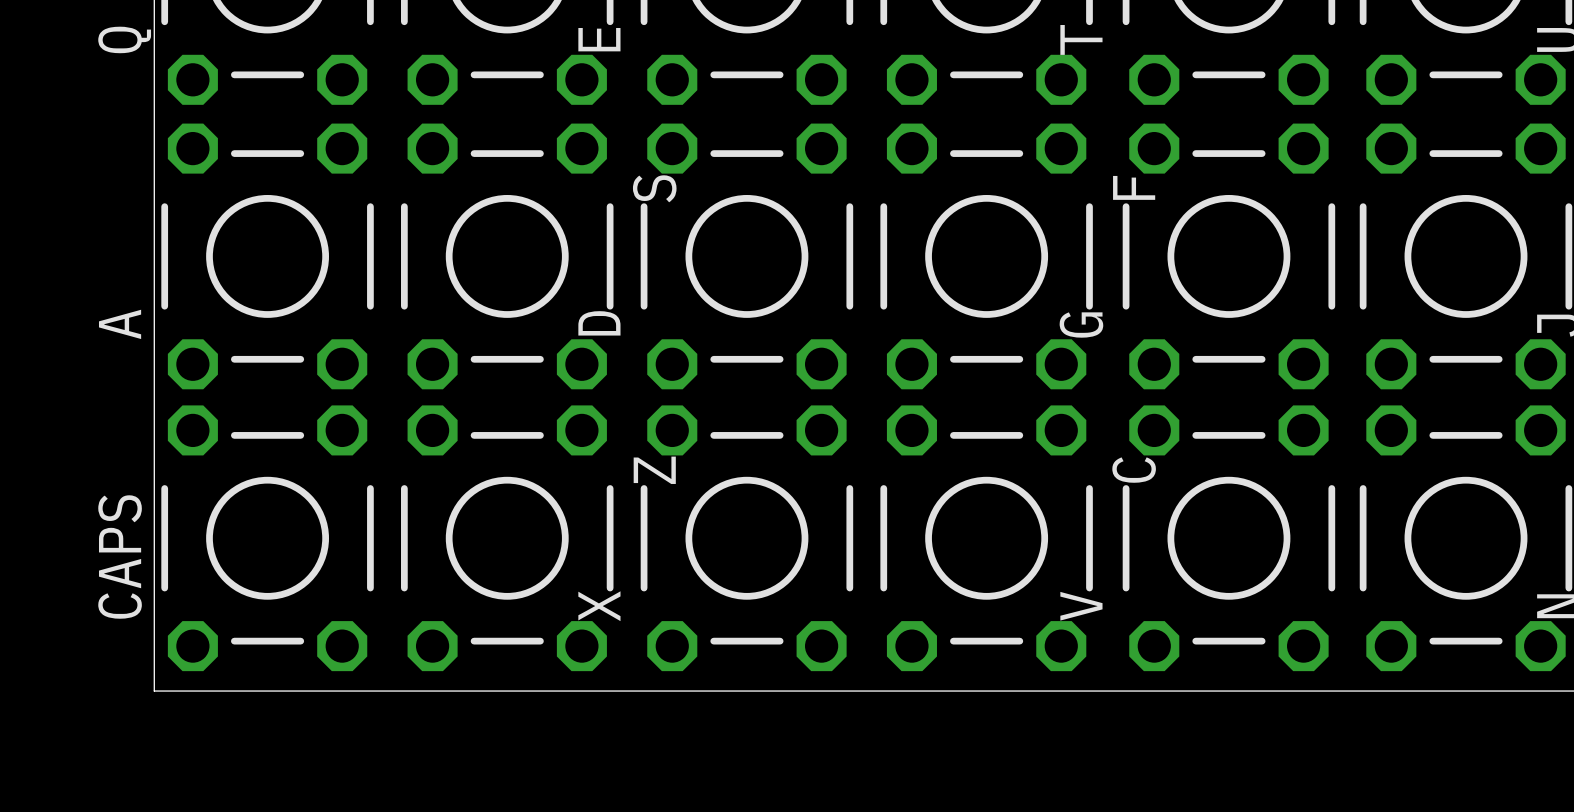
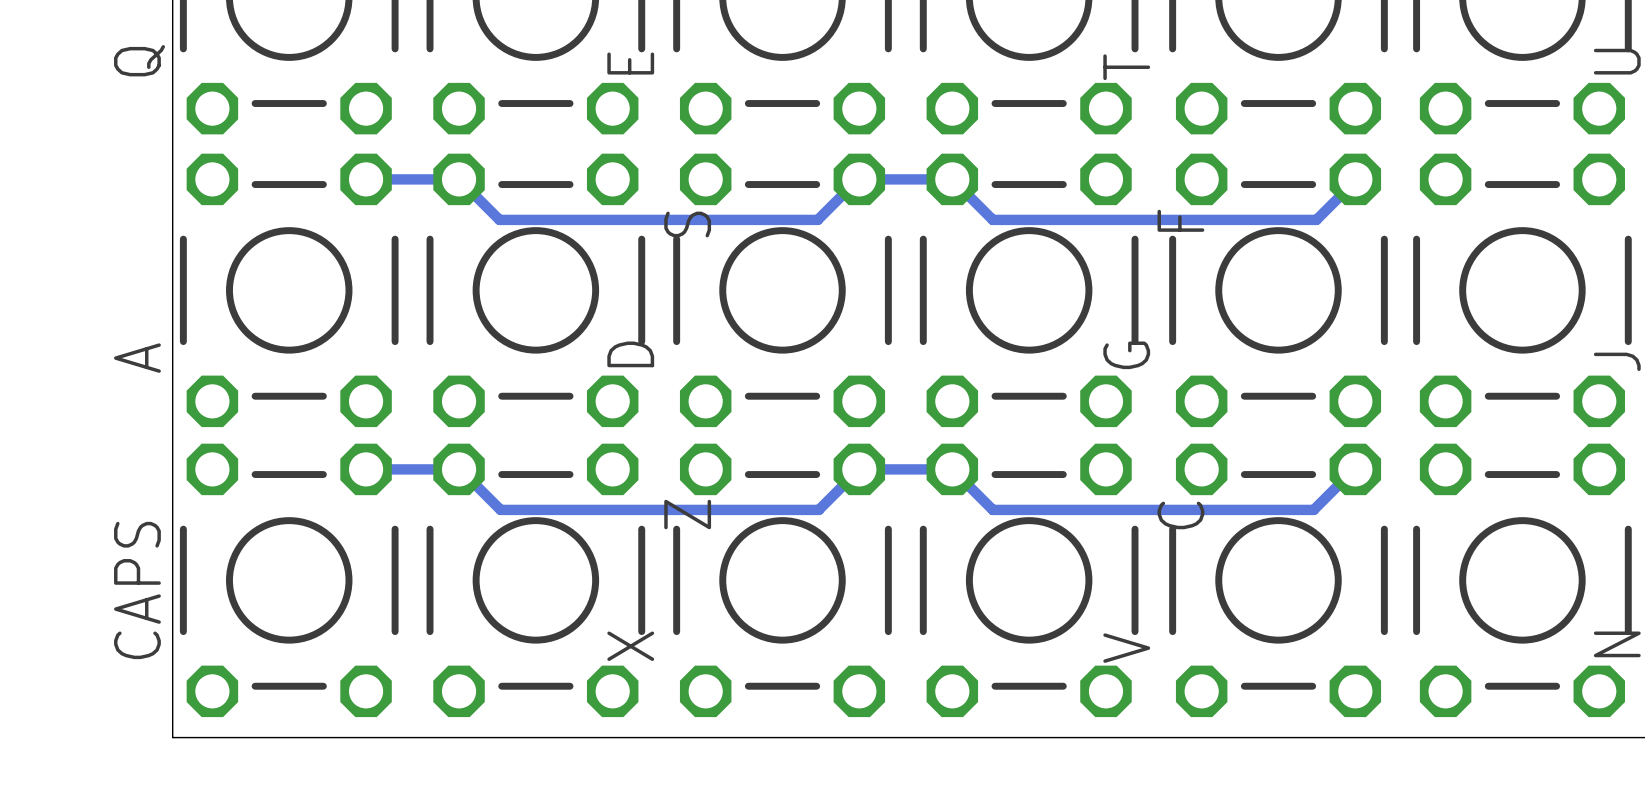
bottom track: none -> (366, 179) (459, 179) (499, 219) (817, 219) (858, 179) (952, 179) (992, 219) (1316, 219) (1355, 179)
bottom track: none -> (366, 469) (460, 469) (500, 509) (818, 509) (859, 469) (952, 469) (992, 509) (1313, 509) (1355, 469)

